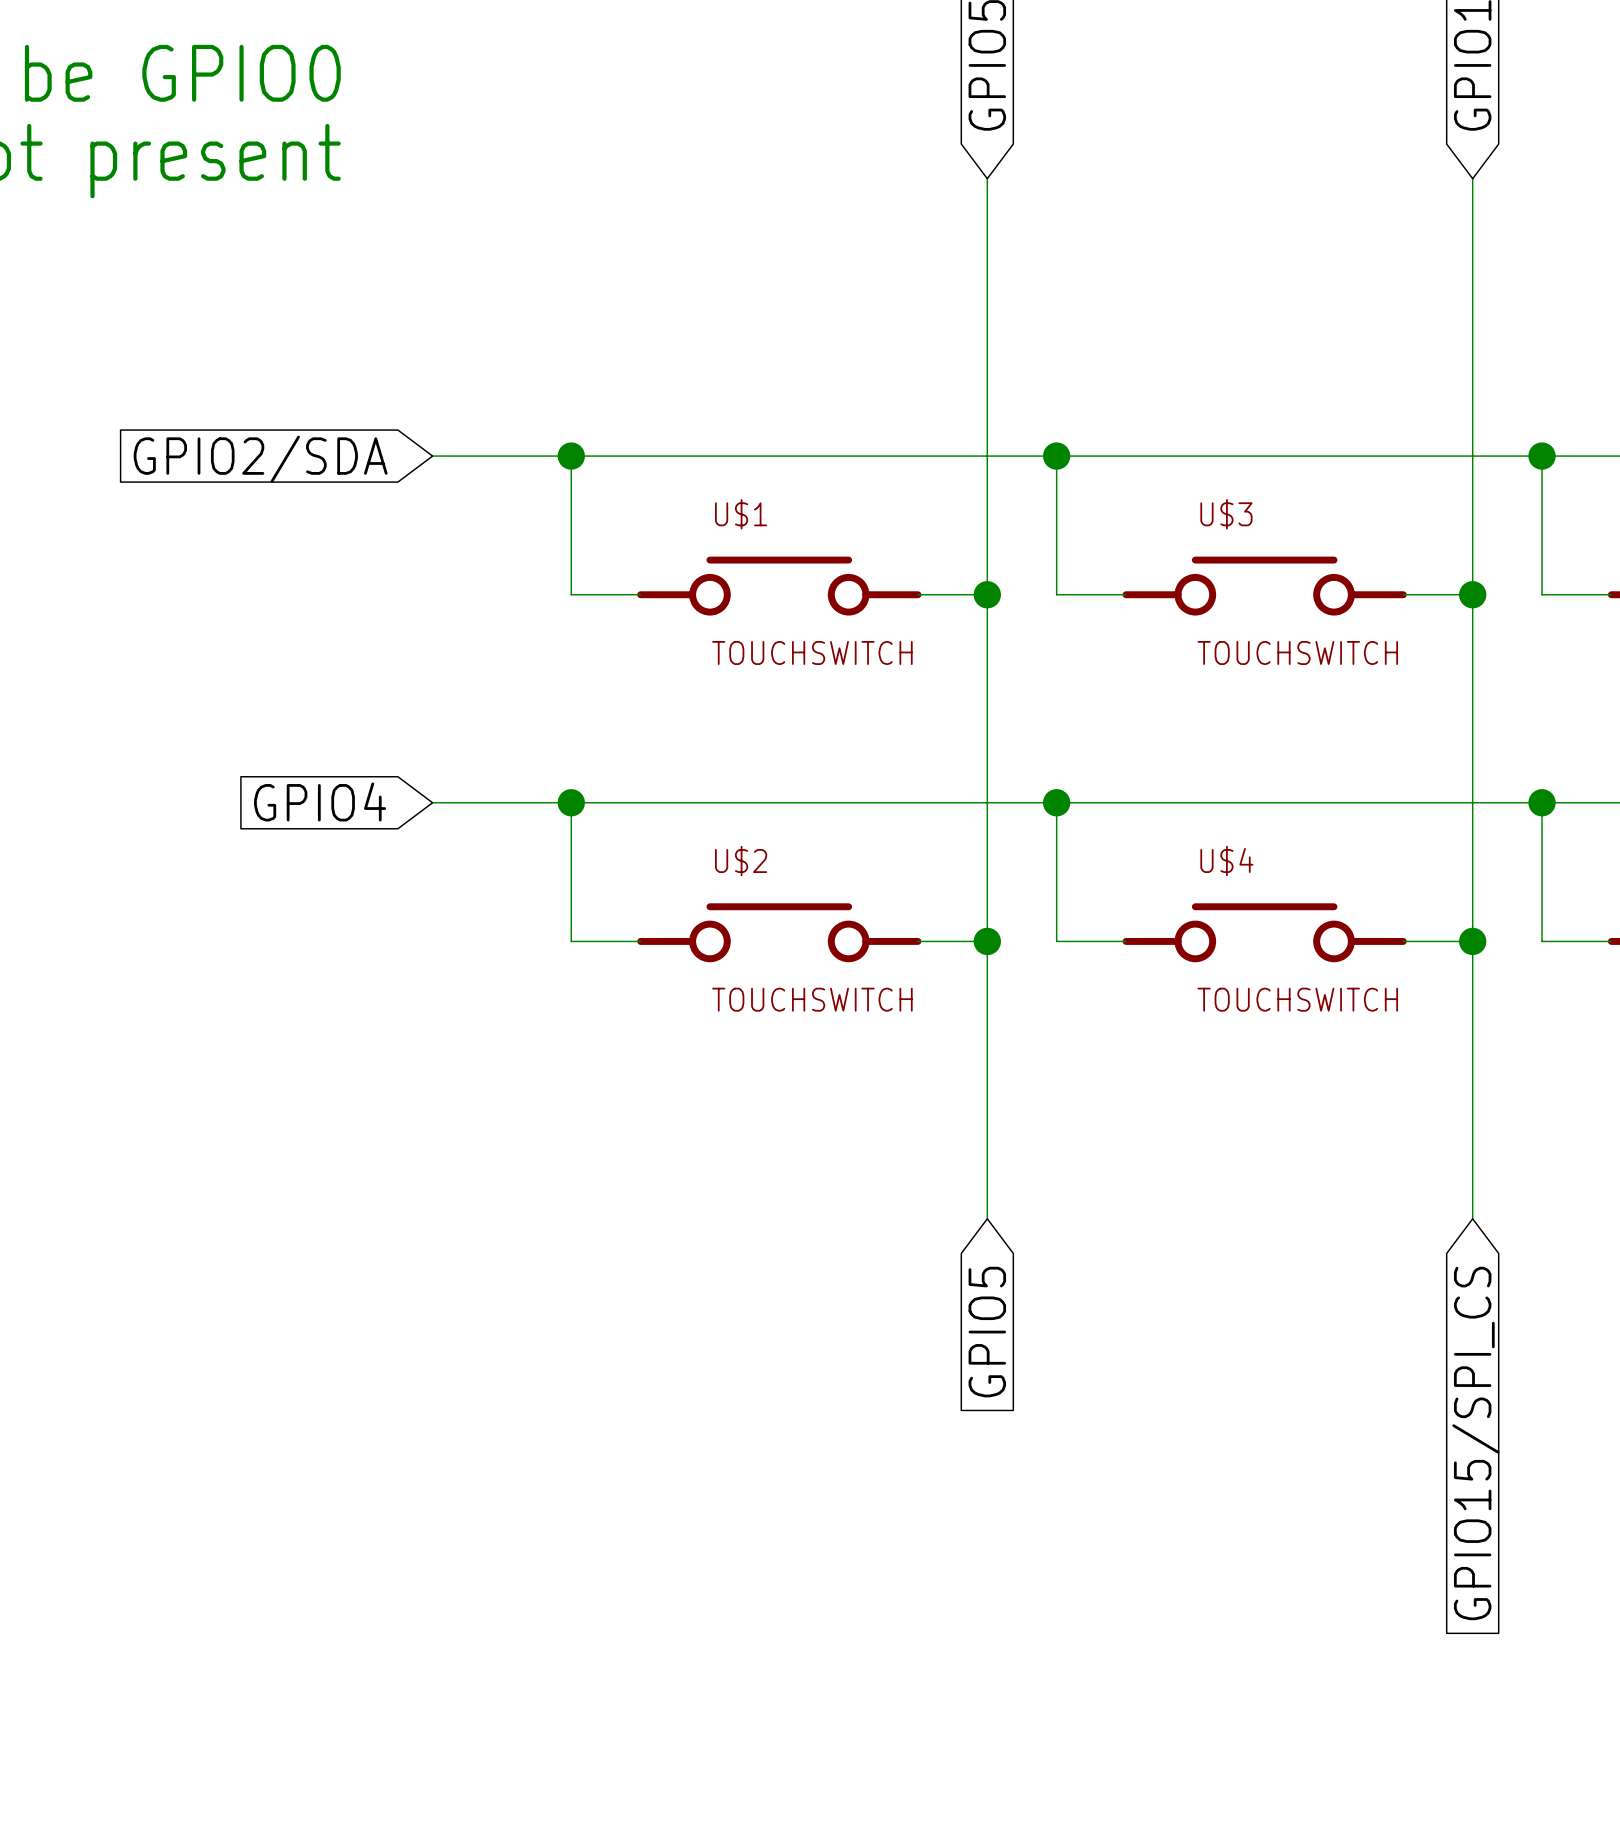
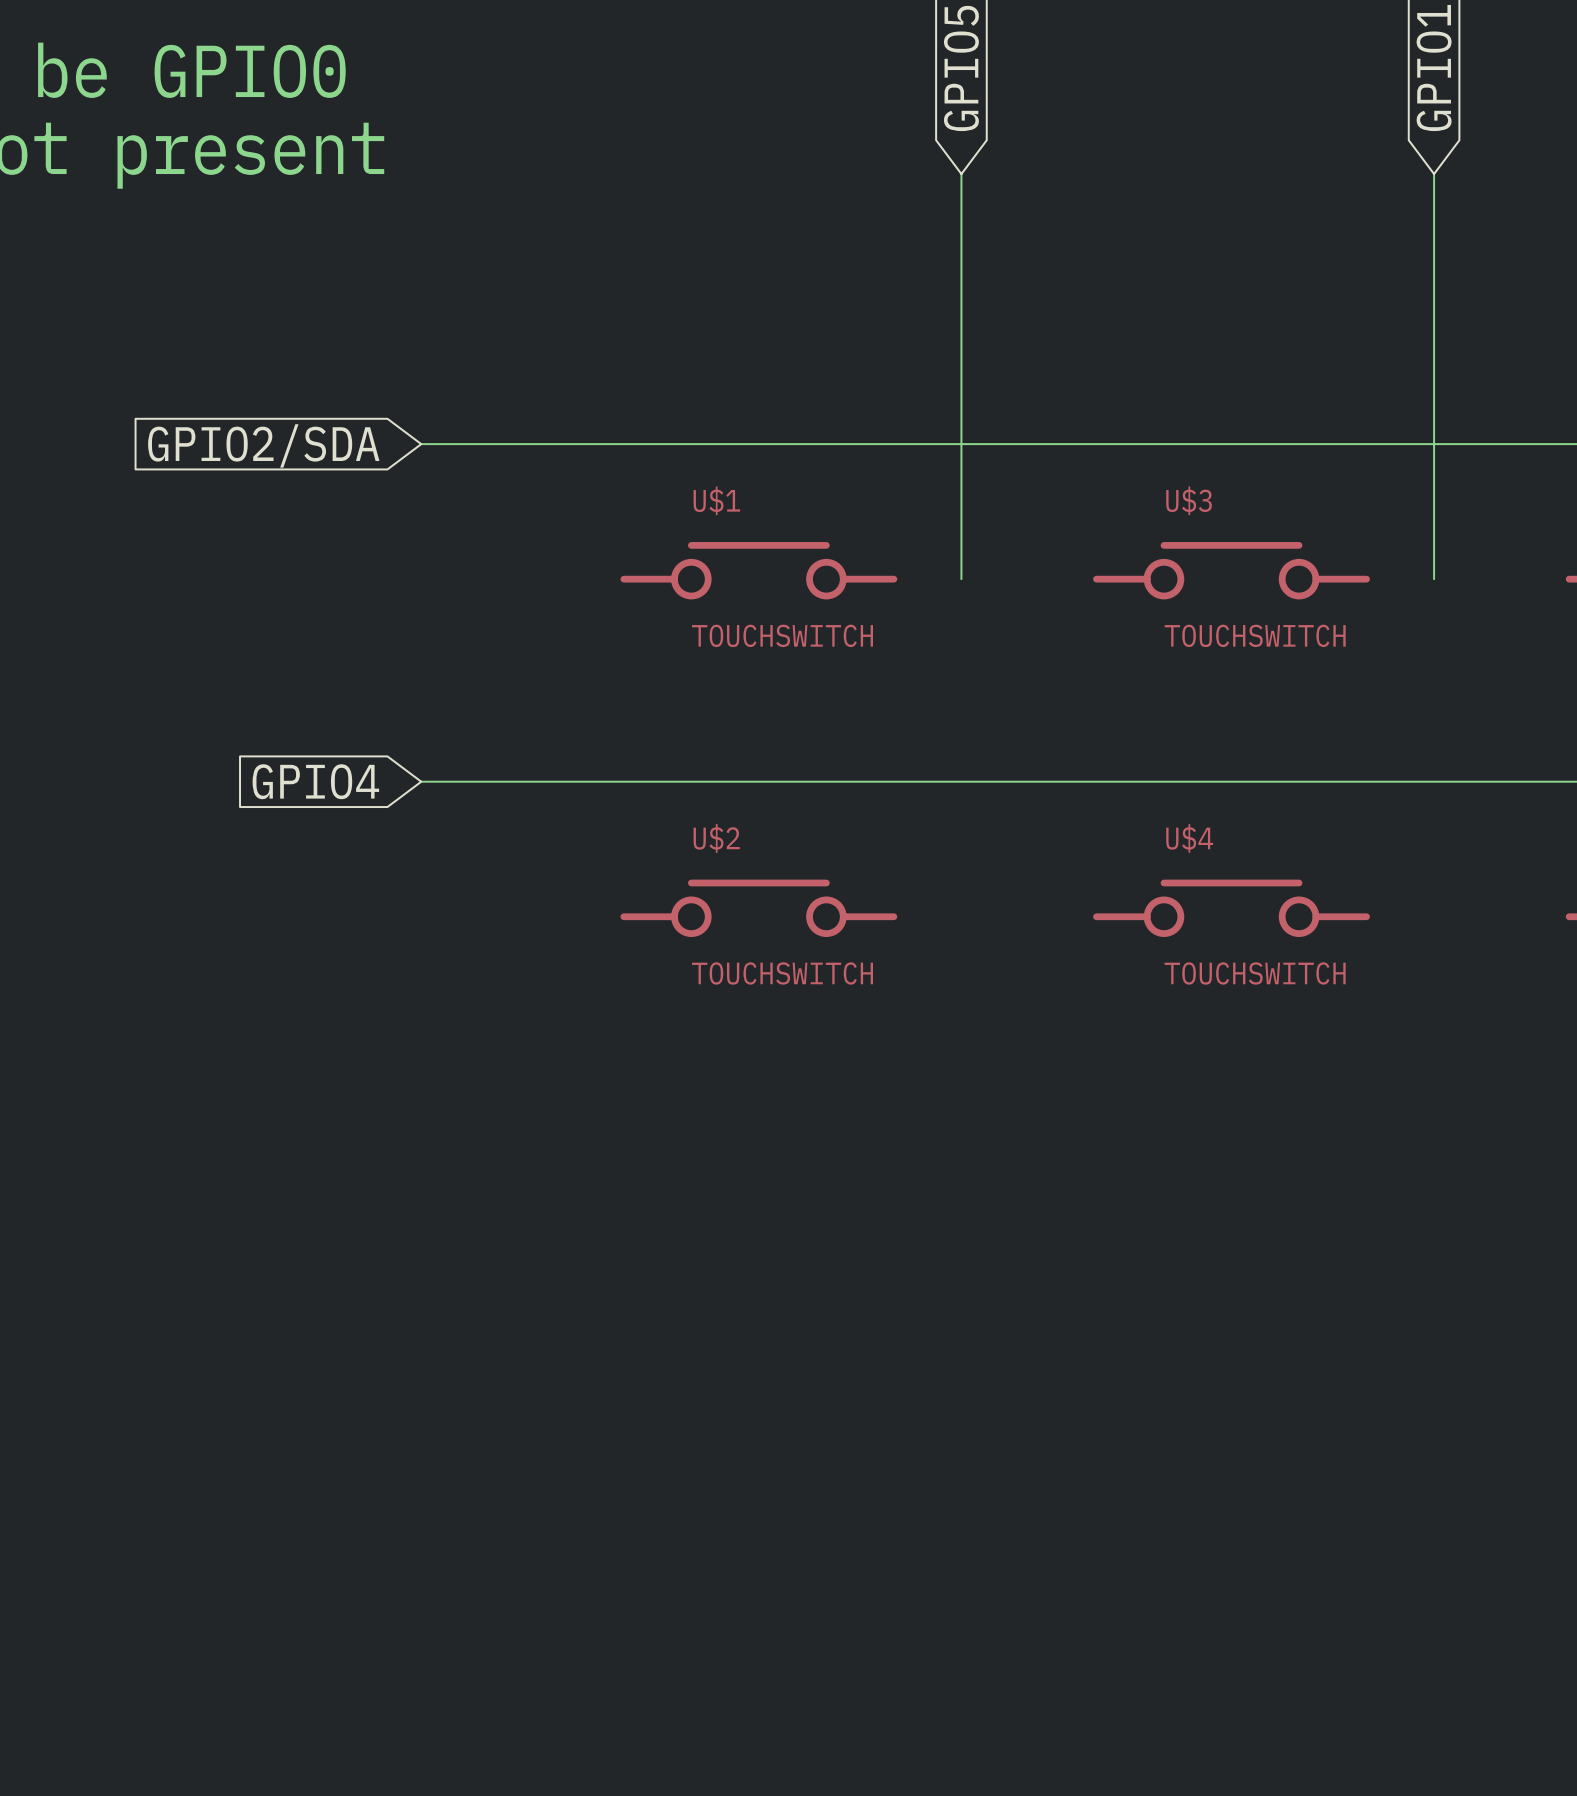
wire: (571, 456) (571, 594) (640, 594) -> none
junction: (571, 456) -> none
wire: (1056, 456) (1056, 594) (1125, 594) -> none
junction: (1056, 456) -> none
wire: (1542, 456) (1542, 594) (1611, 594) -> none
junction: (1542, 456) -> none
wire: (917, 594) (987, 594) (987, 1218) -> none
junction: (987, 594) -> none
wire: (1403, 594) (1472, 594) (1472, 1218) -> none
junction: (1472, 594) -> none
wire: (571, 802) (571, 941) (640, 941) -> none
junction: (571, 802) -> none
wire: (1056, 802) (1056, 941) (1125, 941) -> none
junction: (1056, 802) -> none
wire: (1542, 802) (1542, 941) (1611, 941) -> none
junction: (1542, 802) -> none
wire: (917, 941) (987, 941) -> none
junction: (987, 941) -> none
wire: (1403, 941) (1472, 941) -> none
junction: (1472, 941) -> none
global label: GPIO5 (987, 1332) -> none
global label: GPIO15/SPI_CS (1475, 1443) -> none

